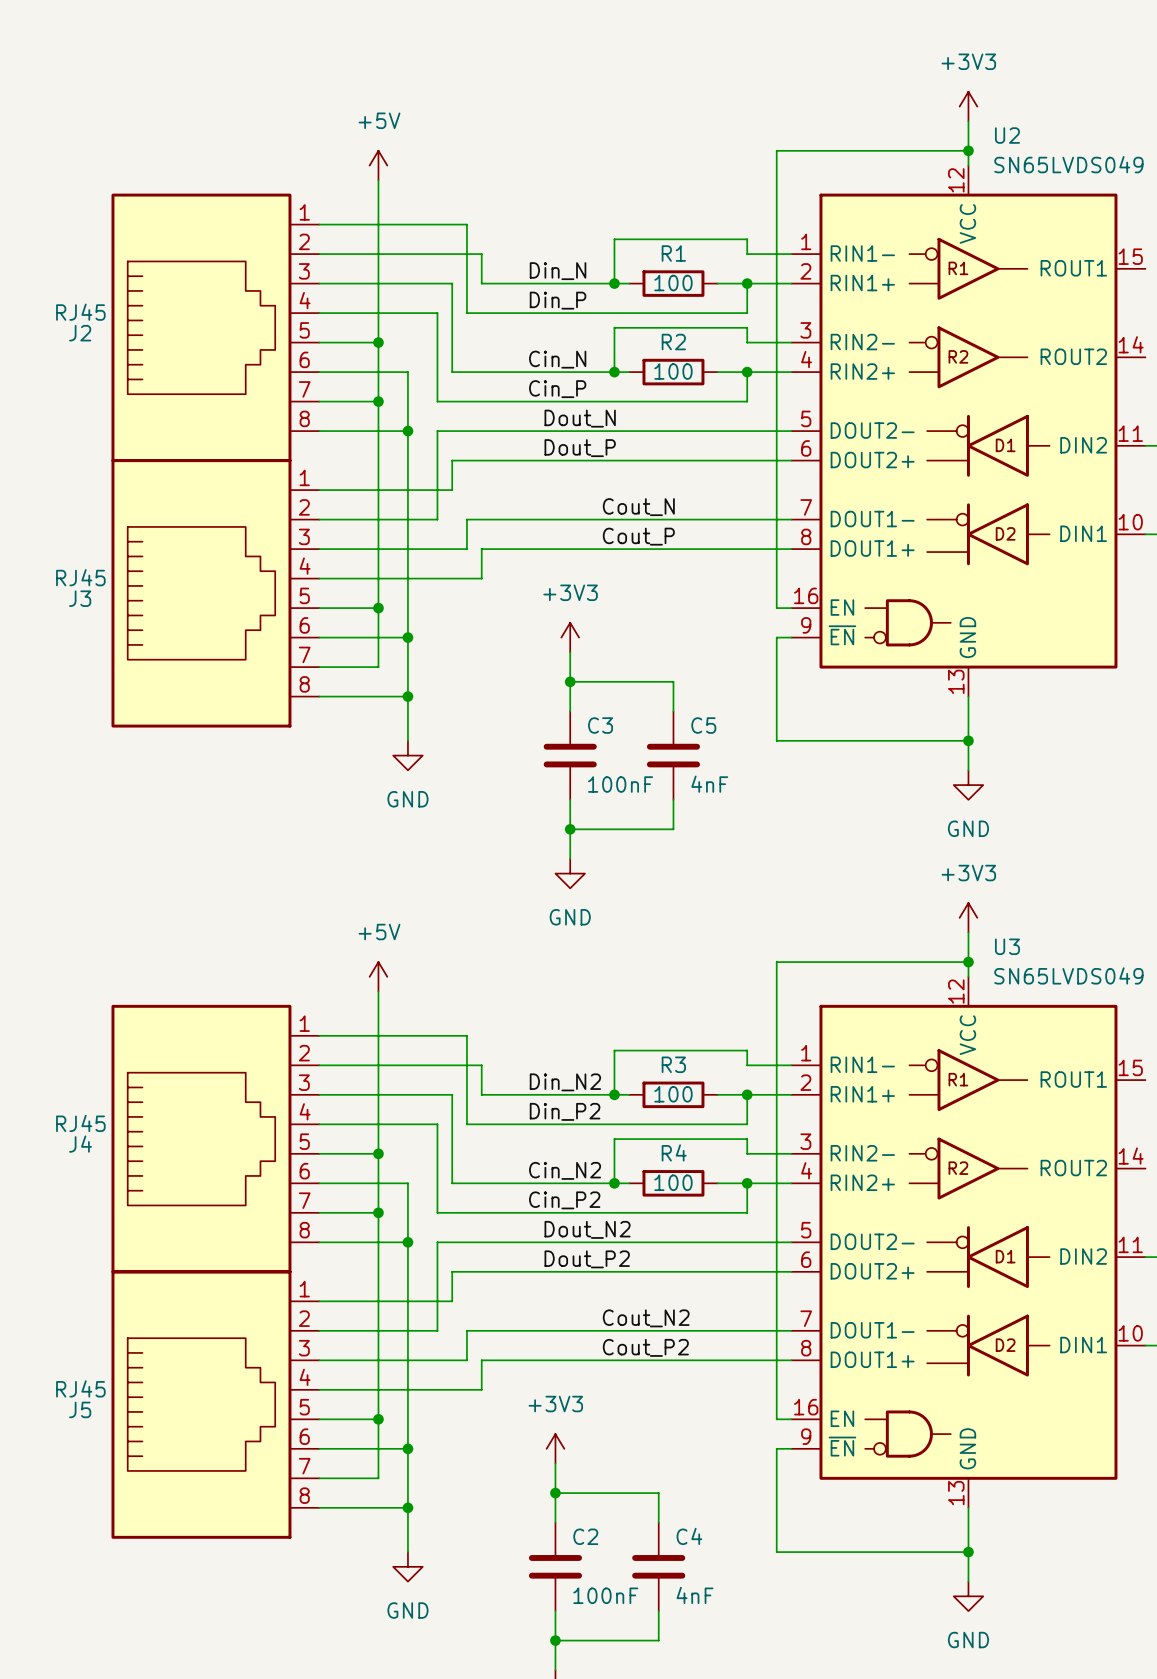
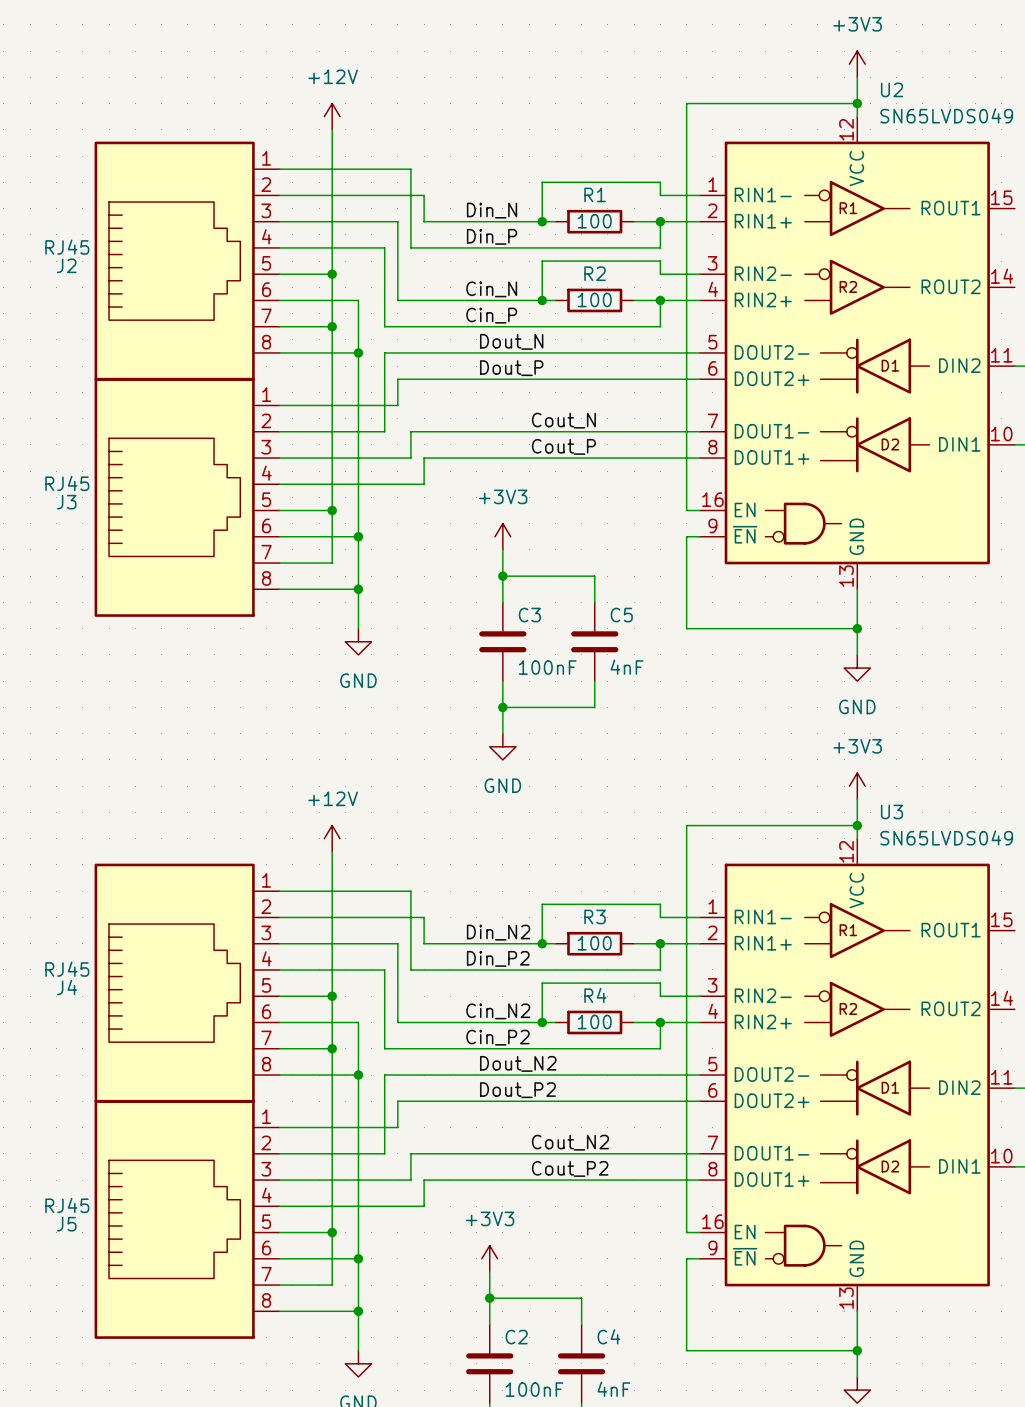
power symbol: +5V (378, 165) -> +12V (332, 116)
power symbol: +5V (378, 976) -> +12V (332, 838)

